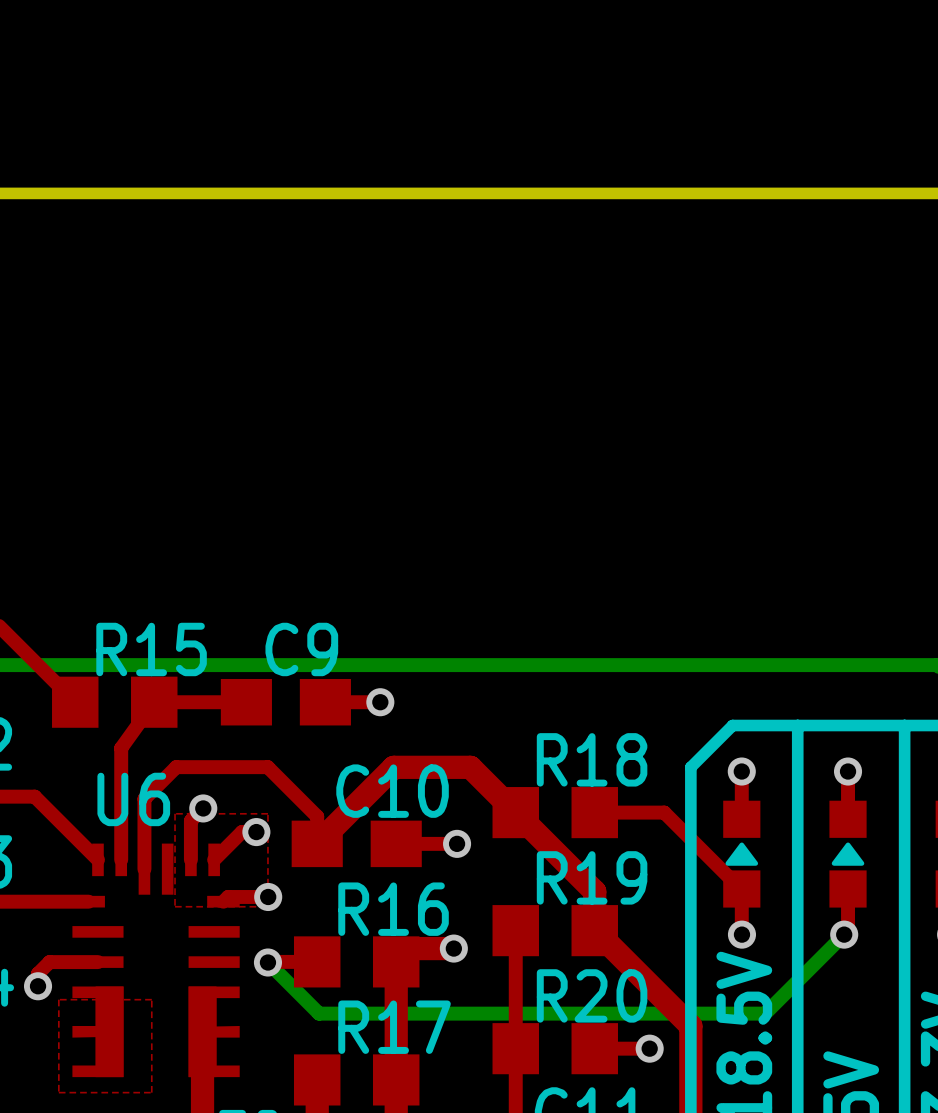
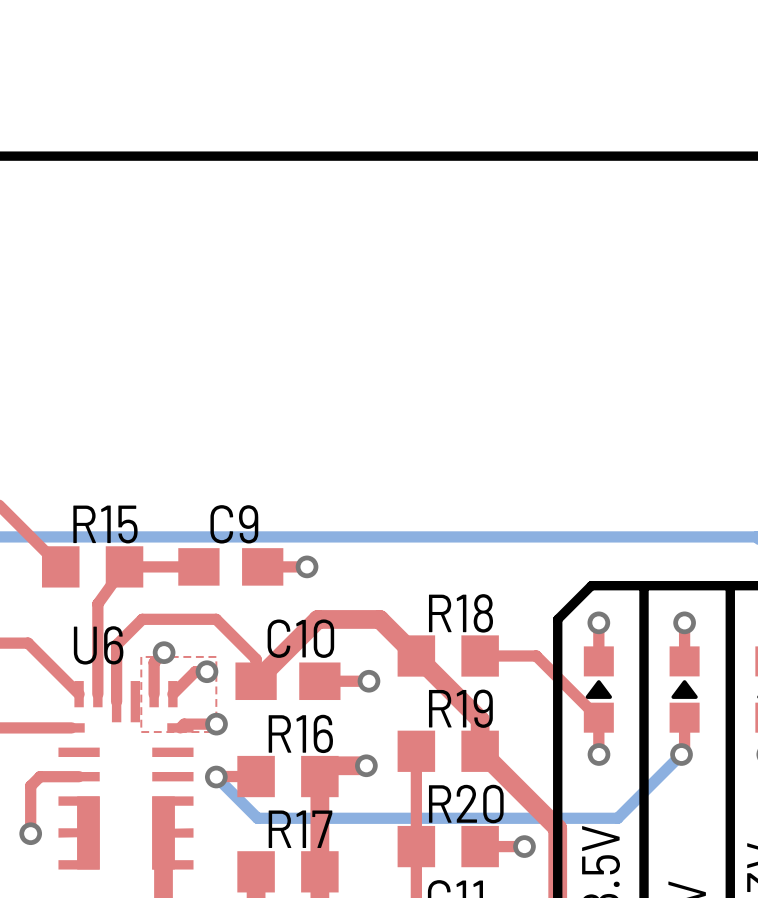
top track: none -> (30, 796) (30, 833)
via position: (38, 986) -> (30, 833)
top zone outline: (58, 999) (58, 1092) (151, 1092) (151, 999) (58, 999) -> none

